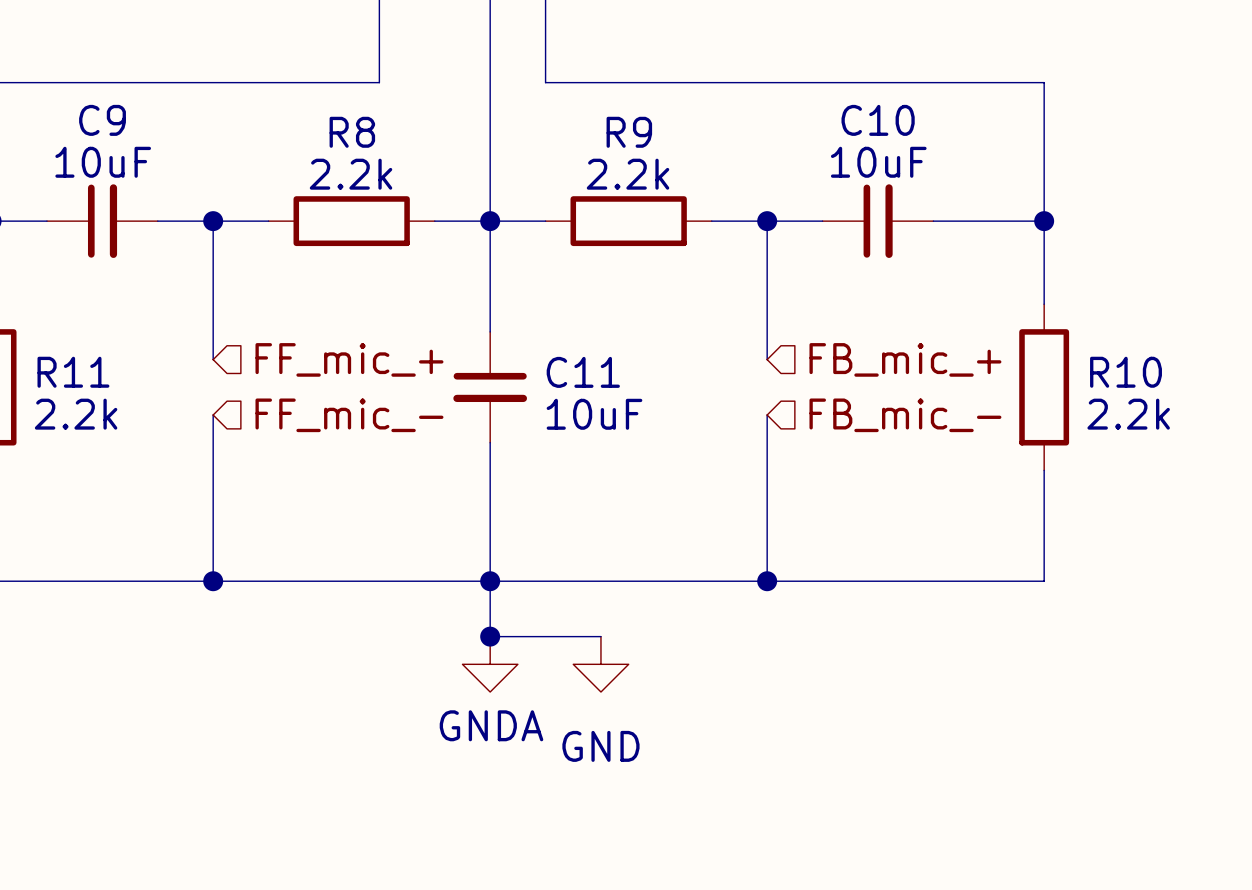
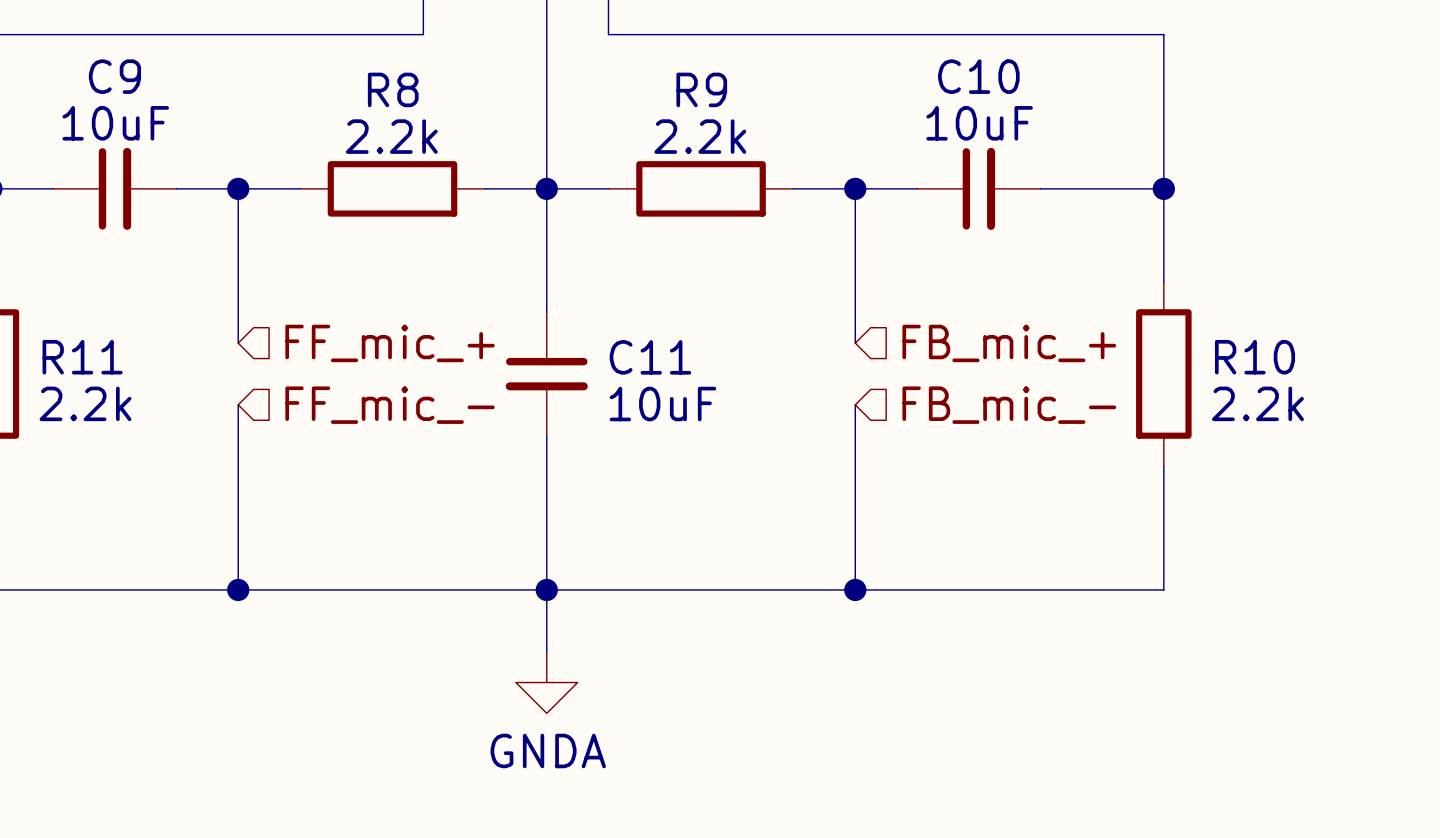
wire: (490, 636) (600, 636) -> none
junction: (490, 636) -> none
power symbol: GND (600, 664) -> none

